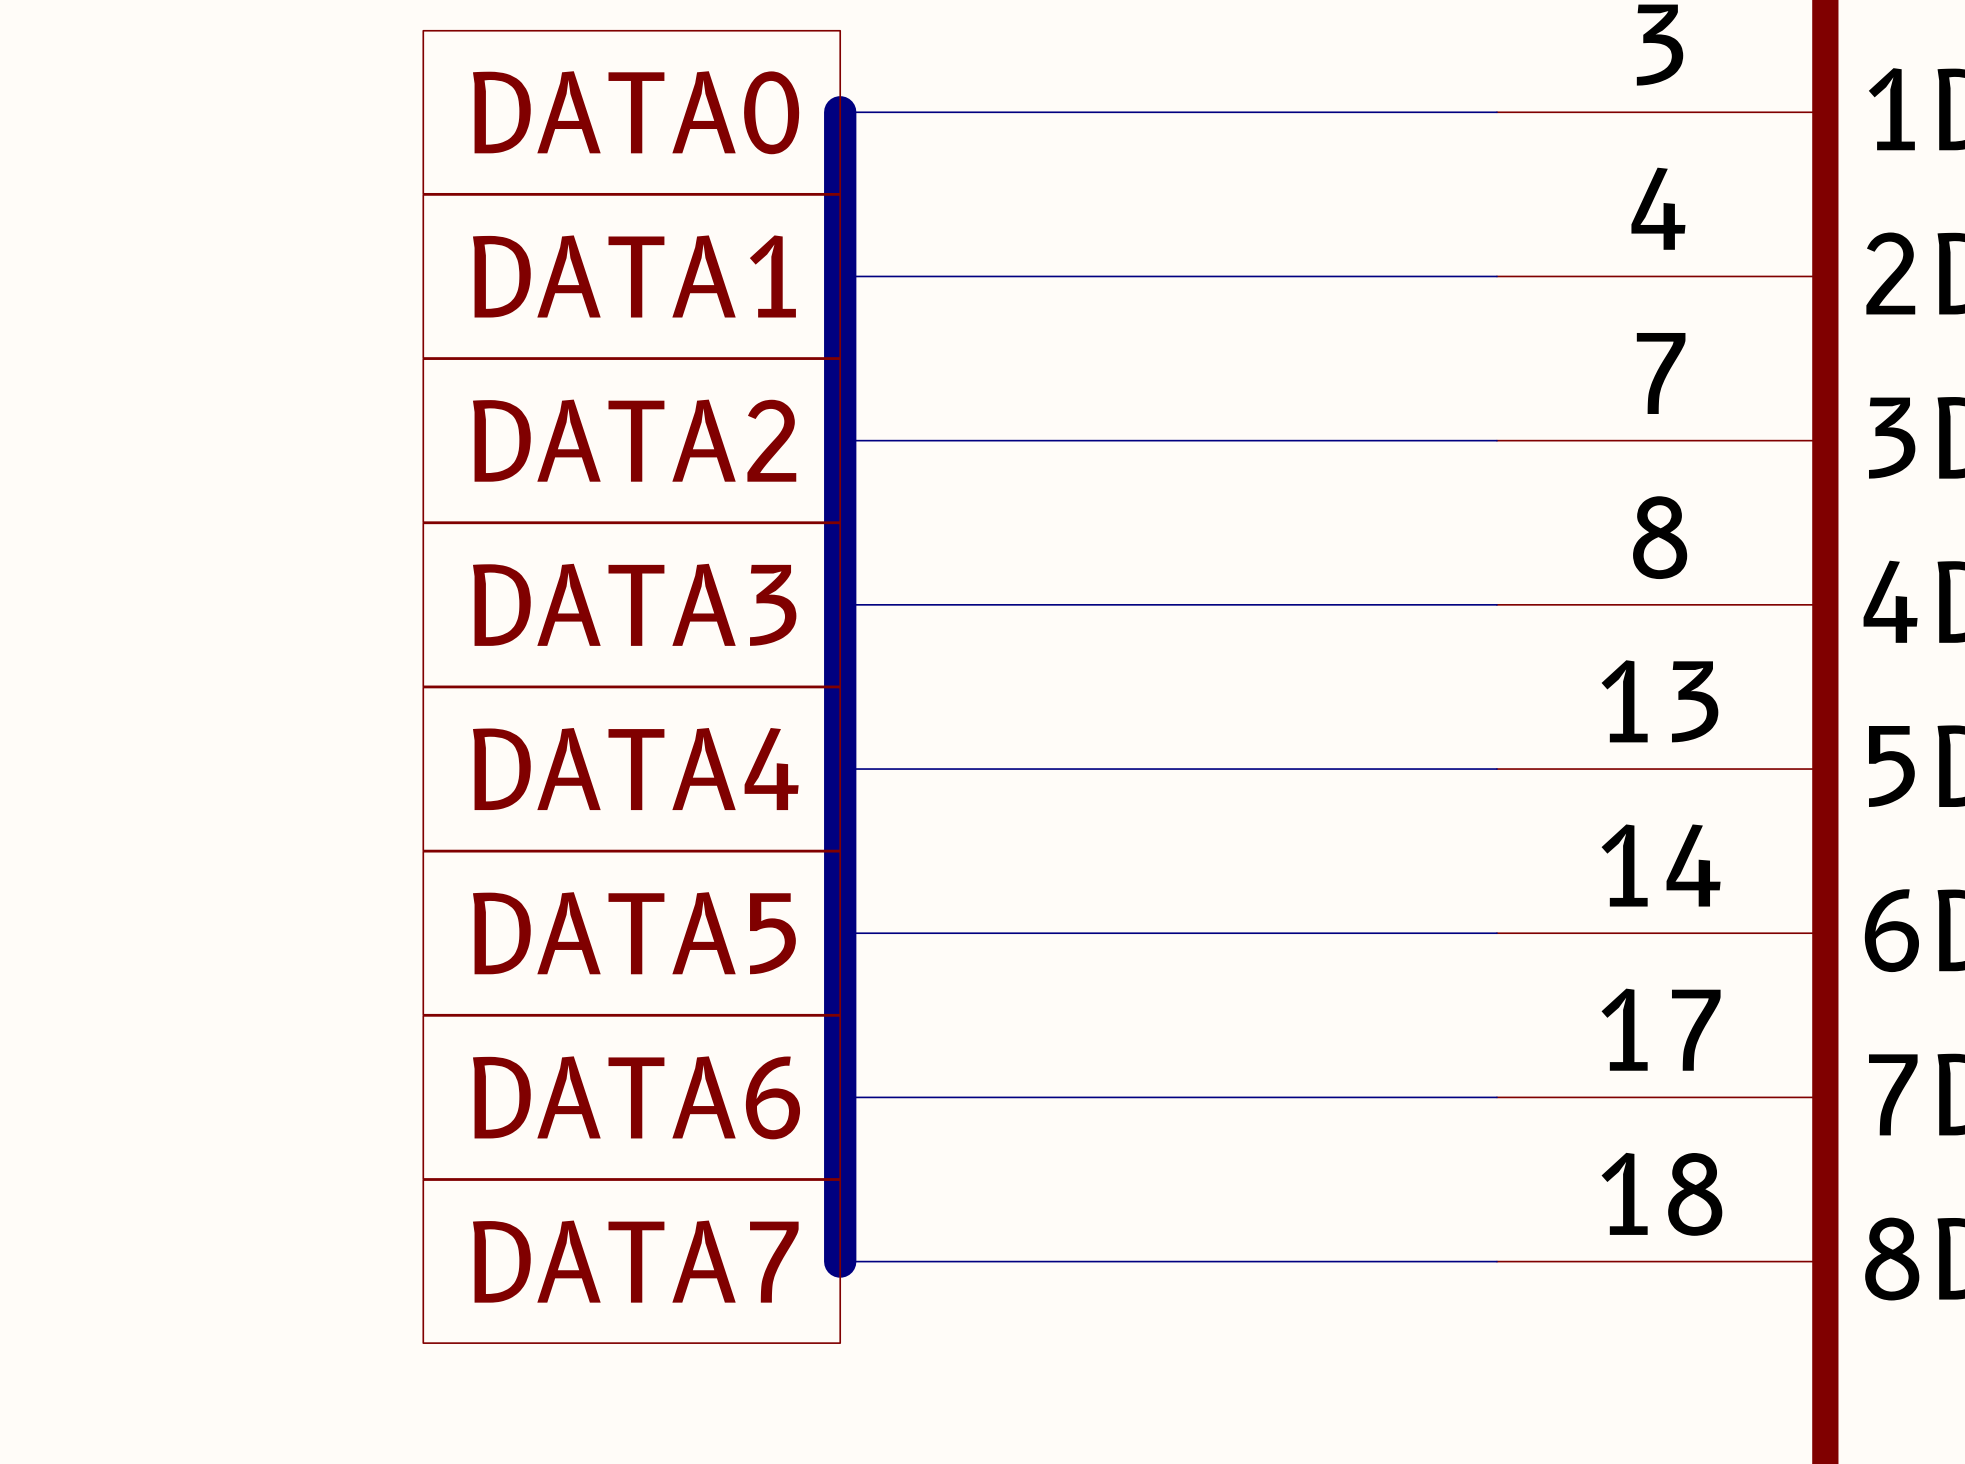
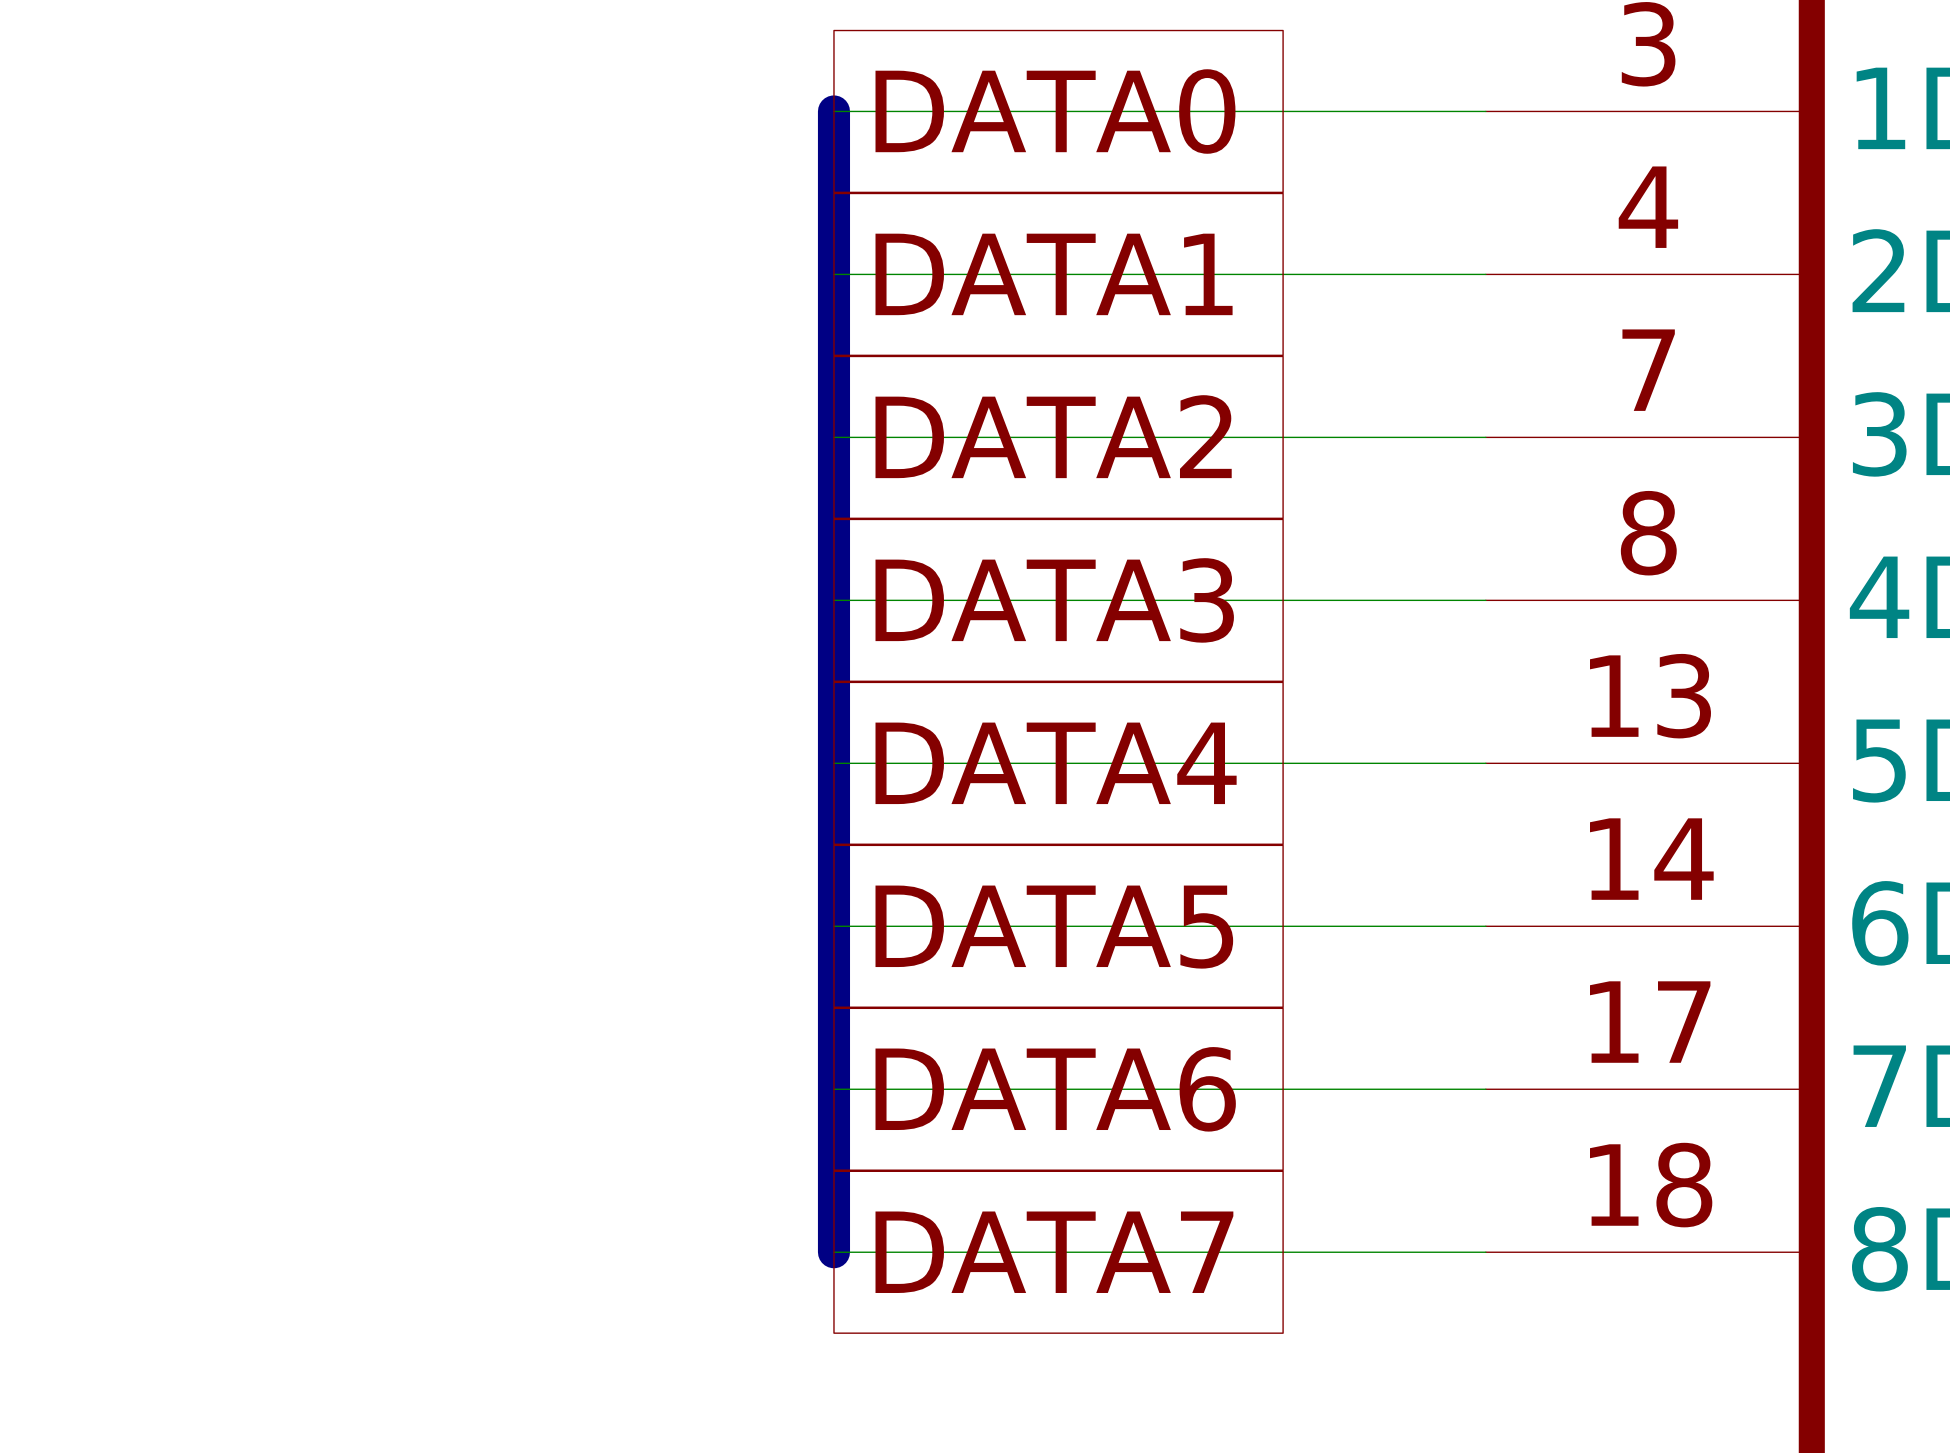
global label rotation: 0° (636, 112) -> 180° (1055, 111)
global label rotation: 0° (634, 276) -> 180° (1054, 274)
global label rotation: 0° (634, 440) -> 180° (1053, 436)
global label rotation: 0° (634, 604) -> 180° (1054, 600)
global label rotation: 0° (635, 769) -> 180° (1056, 763)
global label rotation: 0° (634, 933) -> 180° (1054, 927)
global label rotation: 0° (636, 1097) -> 180° (1055, 1089)
global label rotation: 0° (635, 1261) -> 180° (1054, 1252)

